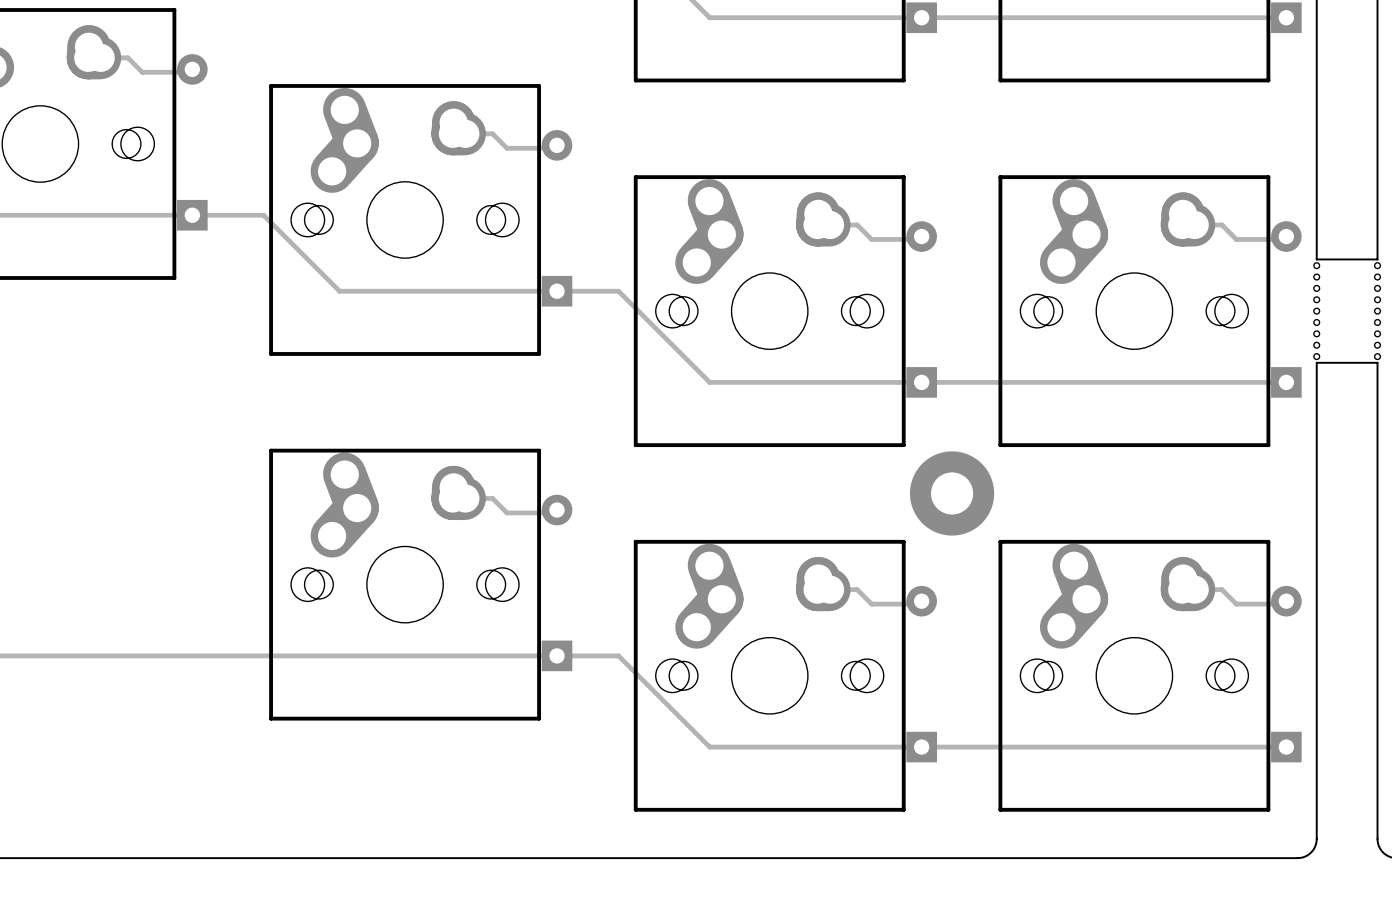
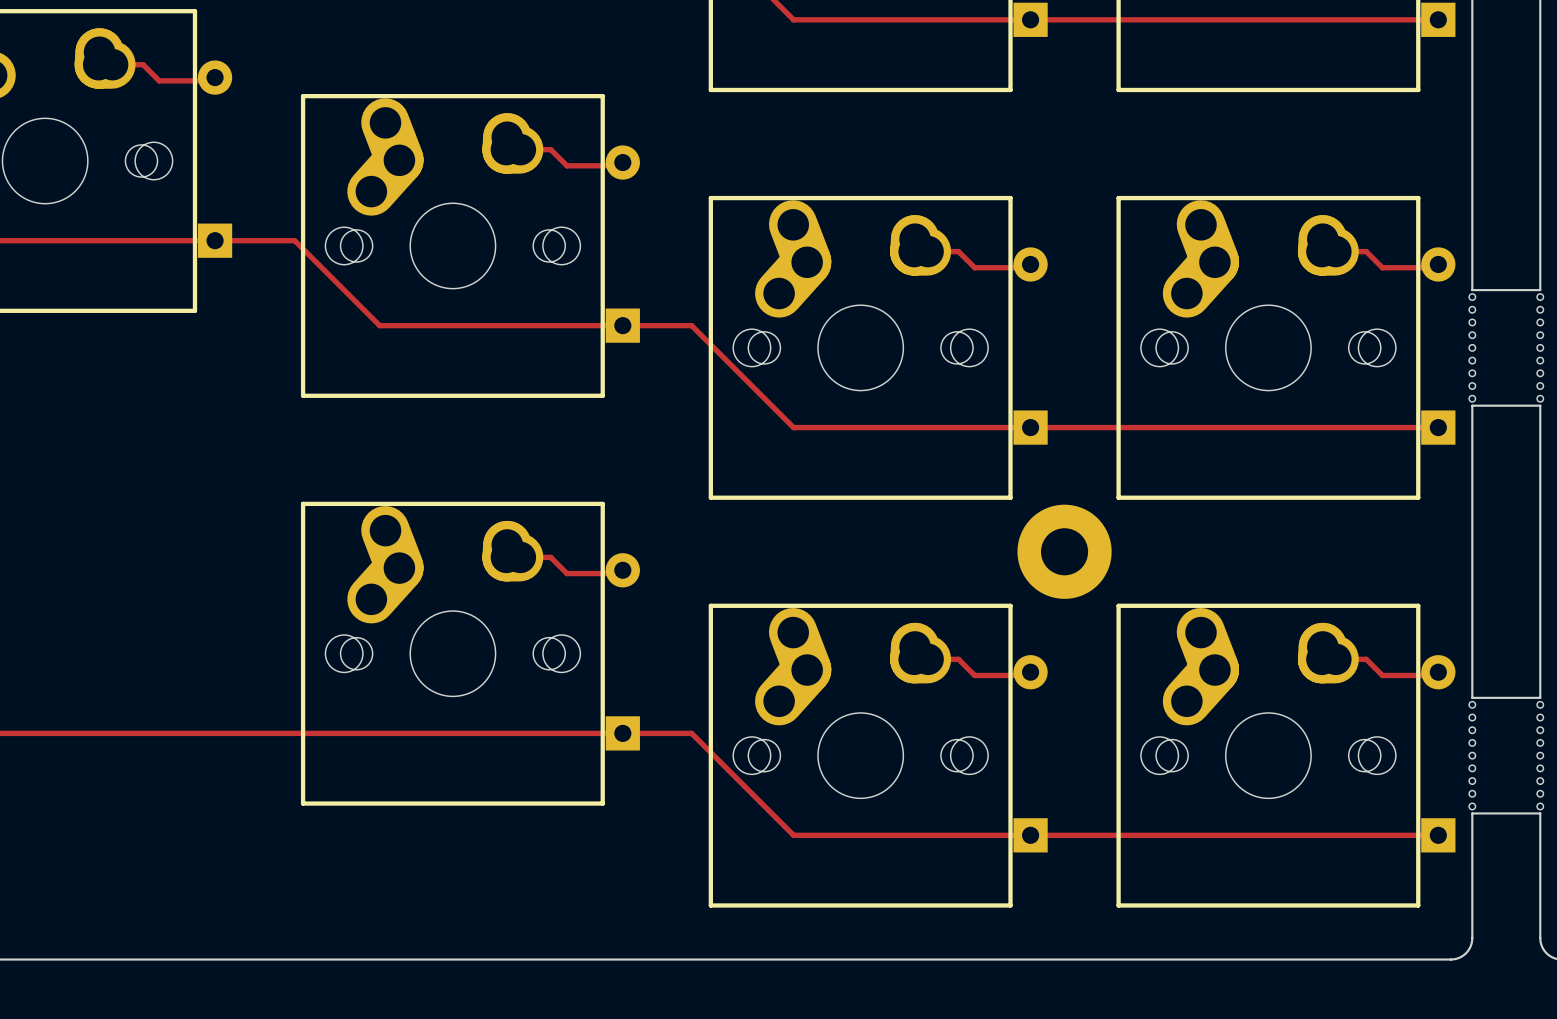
board edge: (1316, 624) (1316, 727) -> (1540, 813) (1472, 813)
board edge: (1377, 624) (1377, 727) -> (1540, 697) (1472, 697)
part: none -> (1472, 755)
part: none -> (1540, 755)

